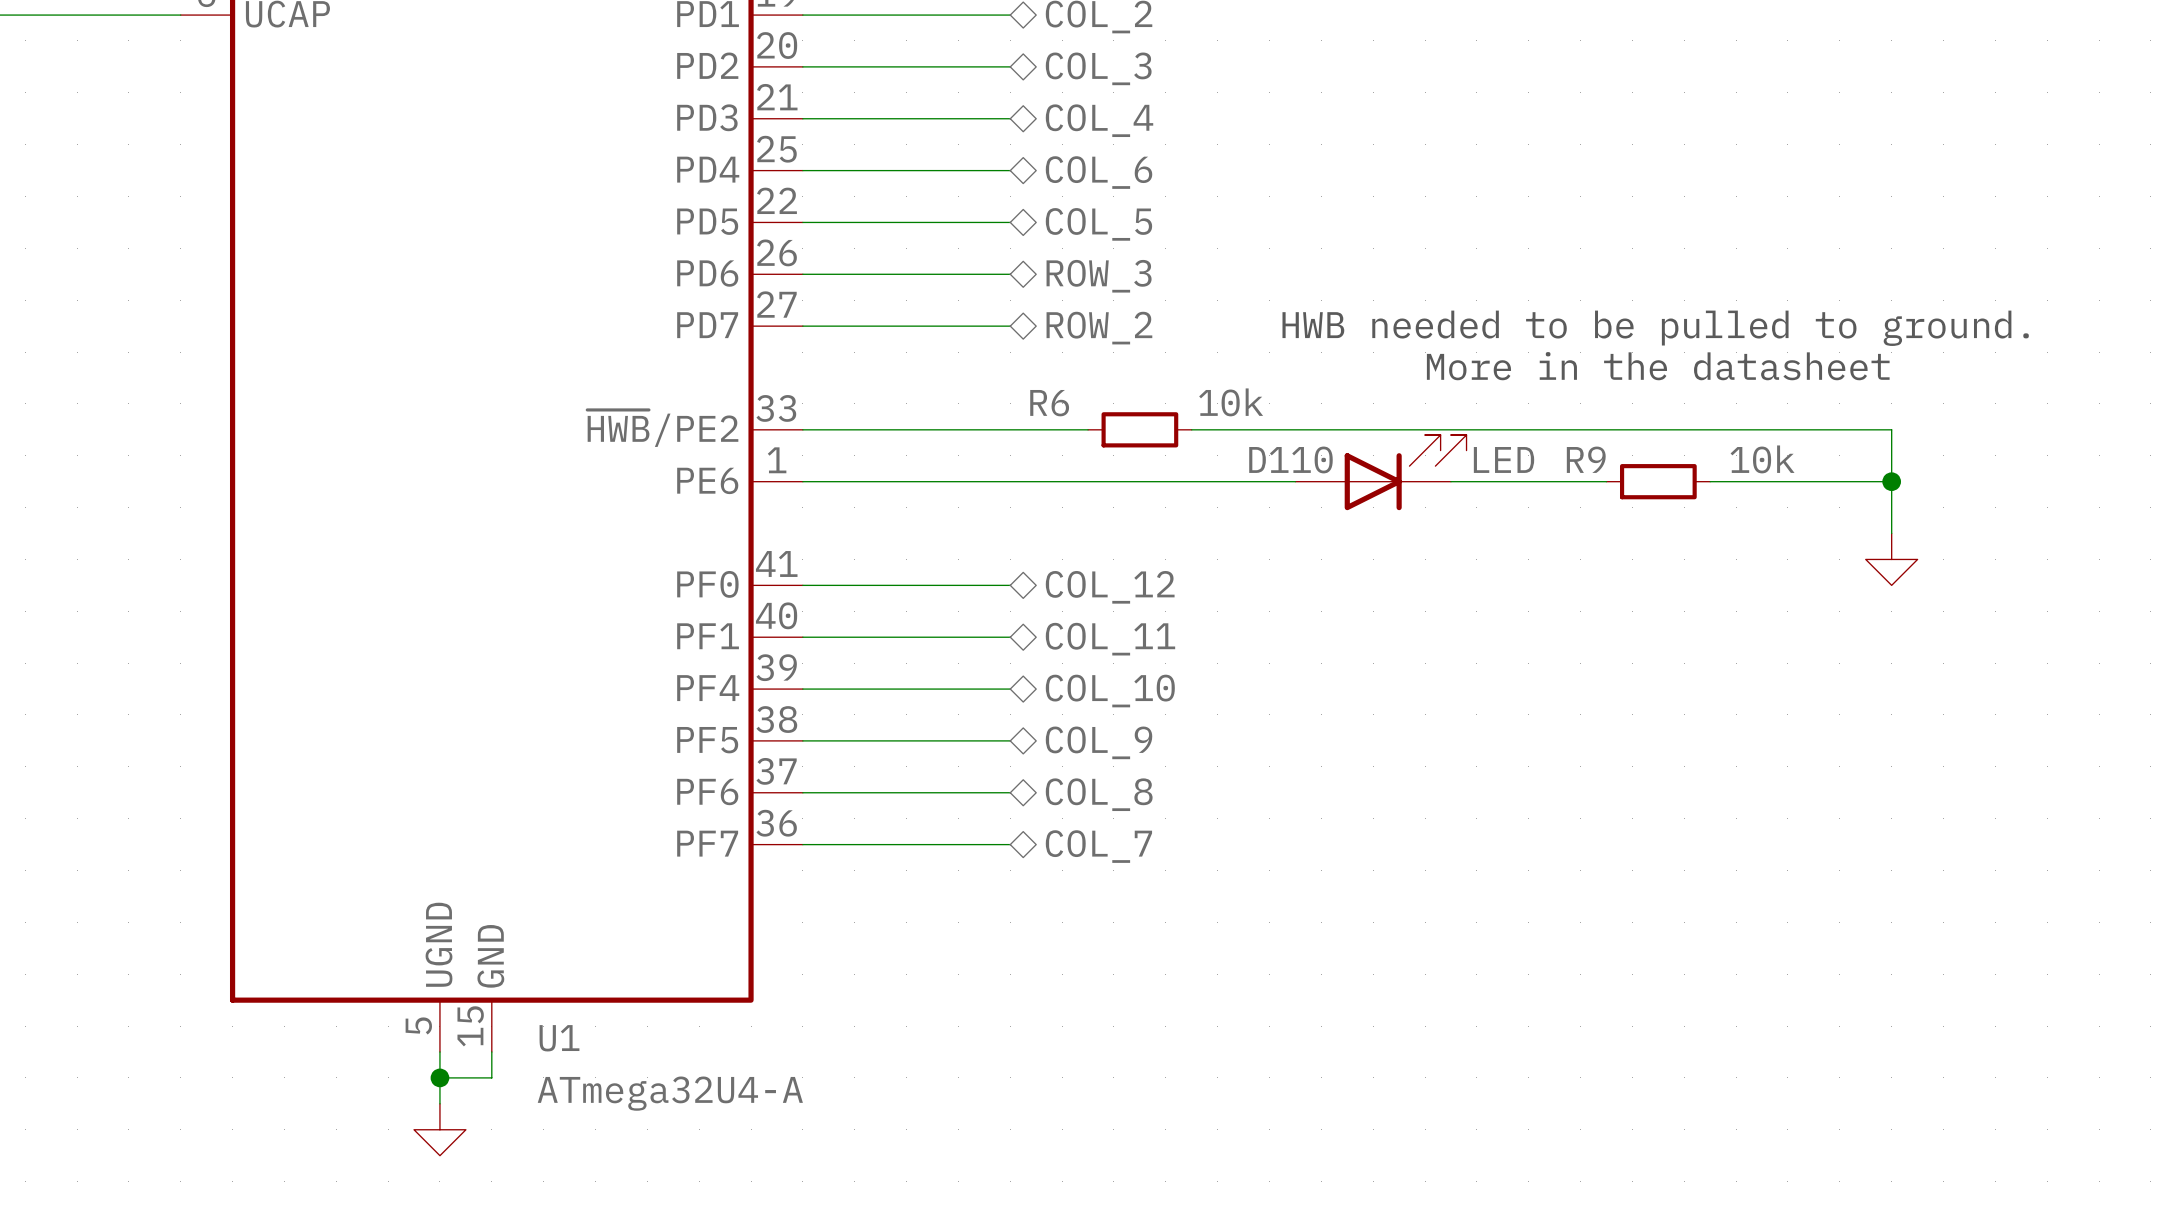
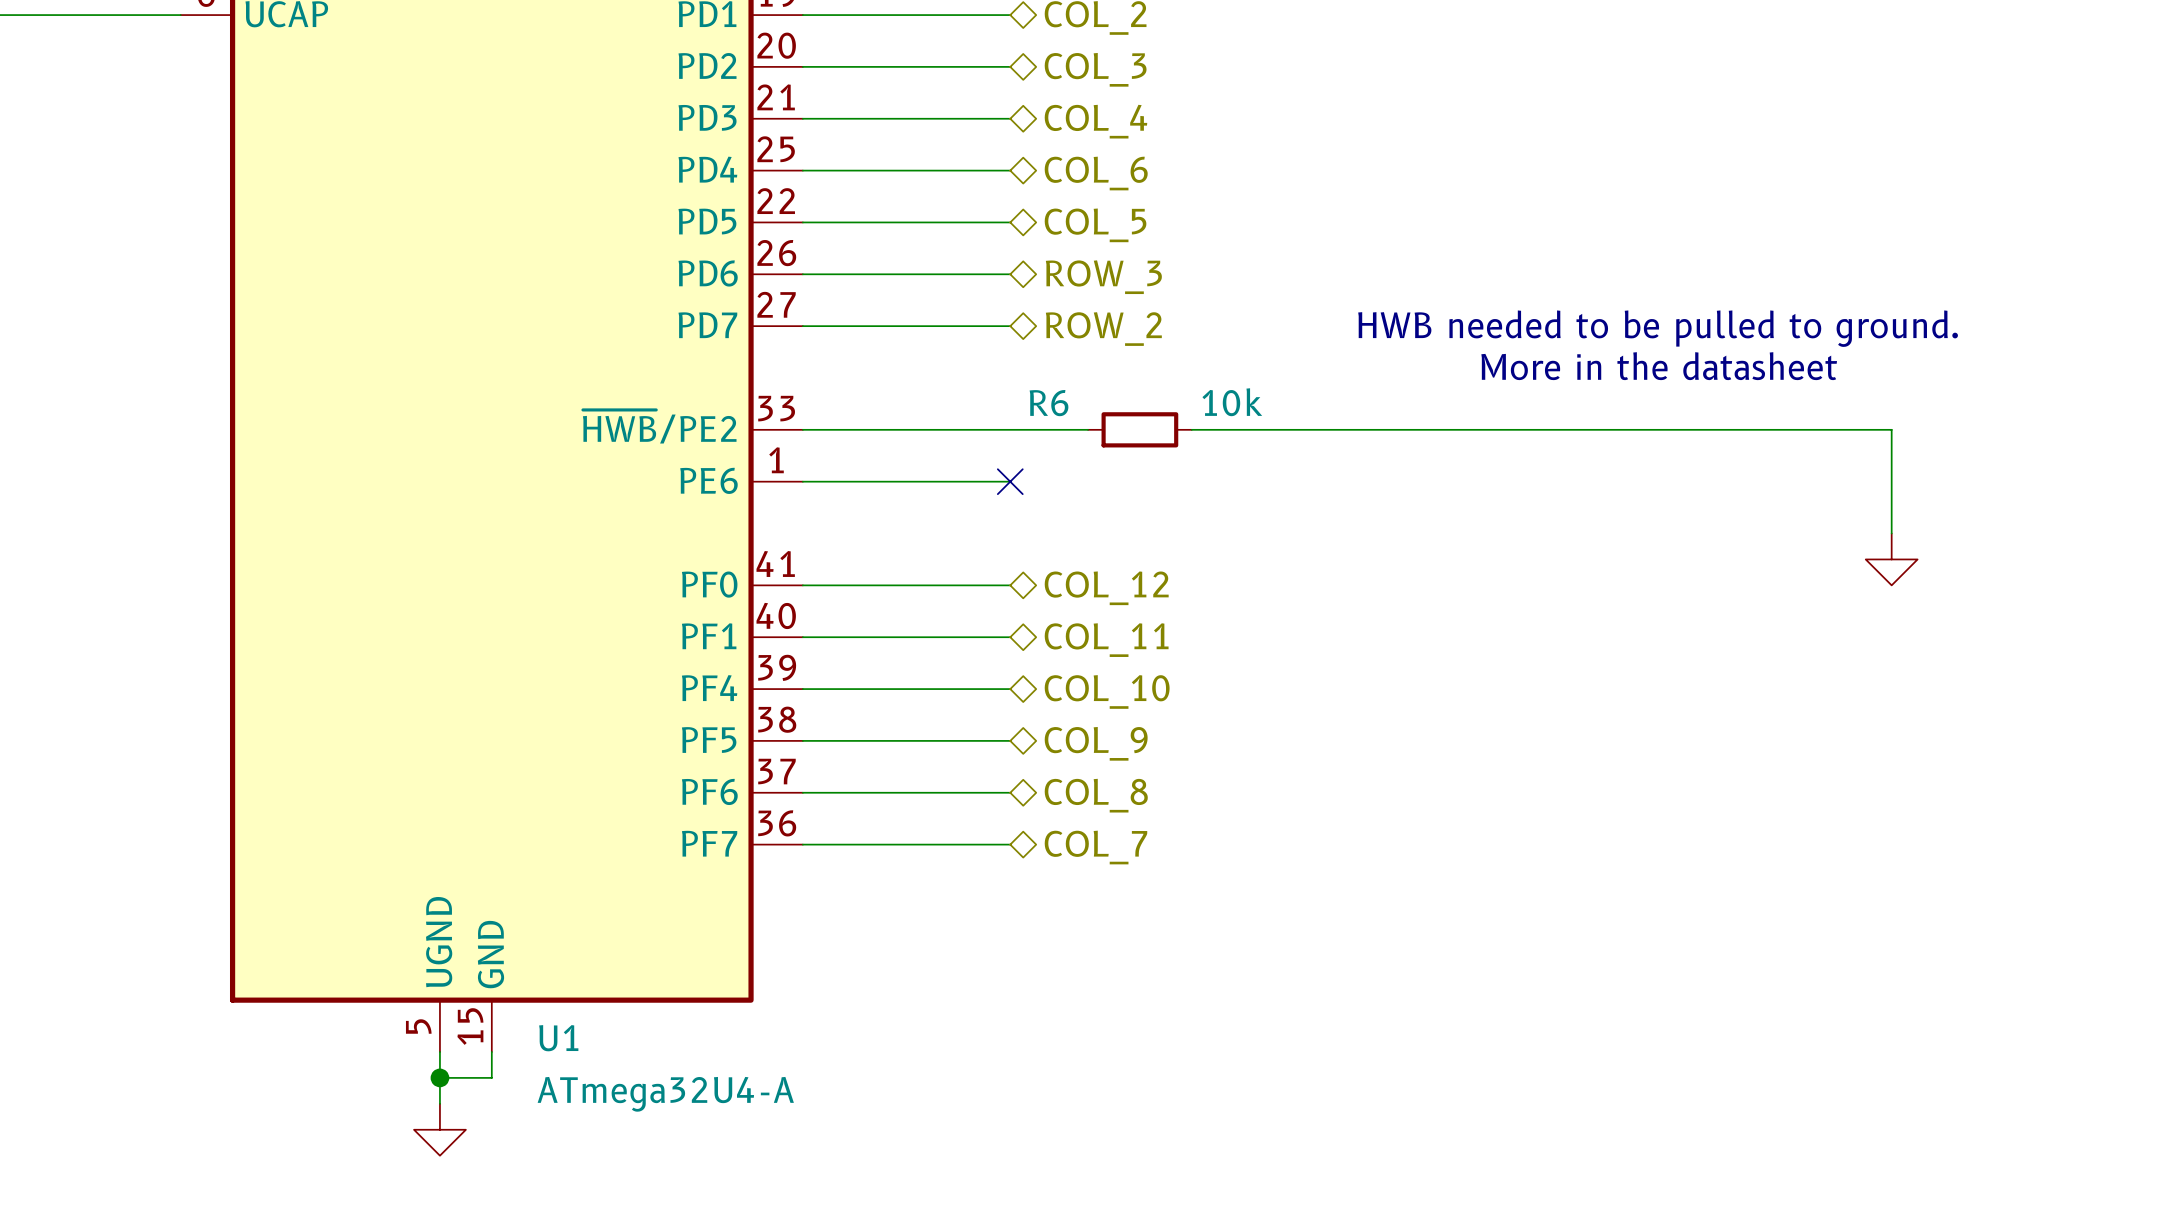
D110: LED (1380, 472) -> none
wire: (1010, 481) (1295, 481) -> none
no-connect mark: none -> (1010, 481)
wire: (1450, 481) (1606, 481) -> none
R9: 10k (1658, 481) -> none
wire: (1710, 481) (1891, 481) -> none
junction: (1891, 481) -> none

